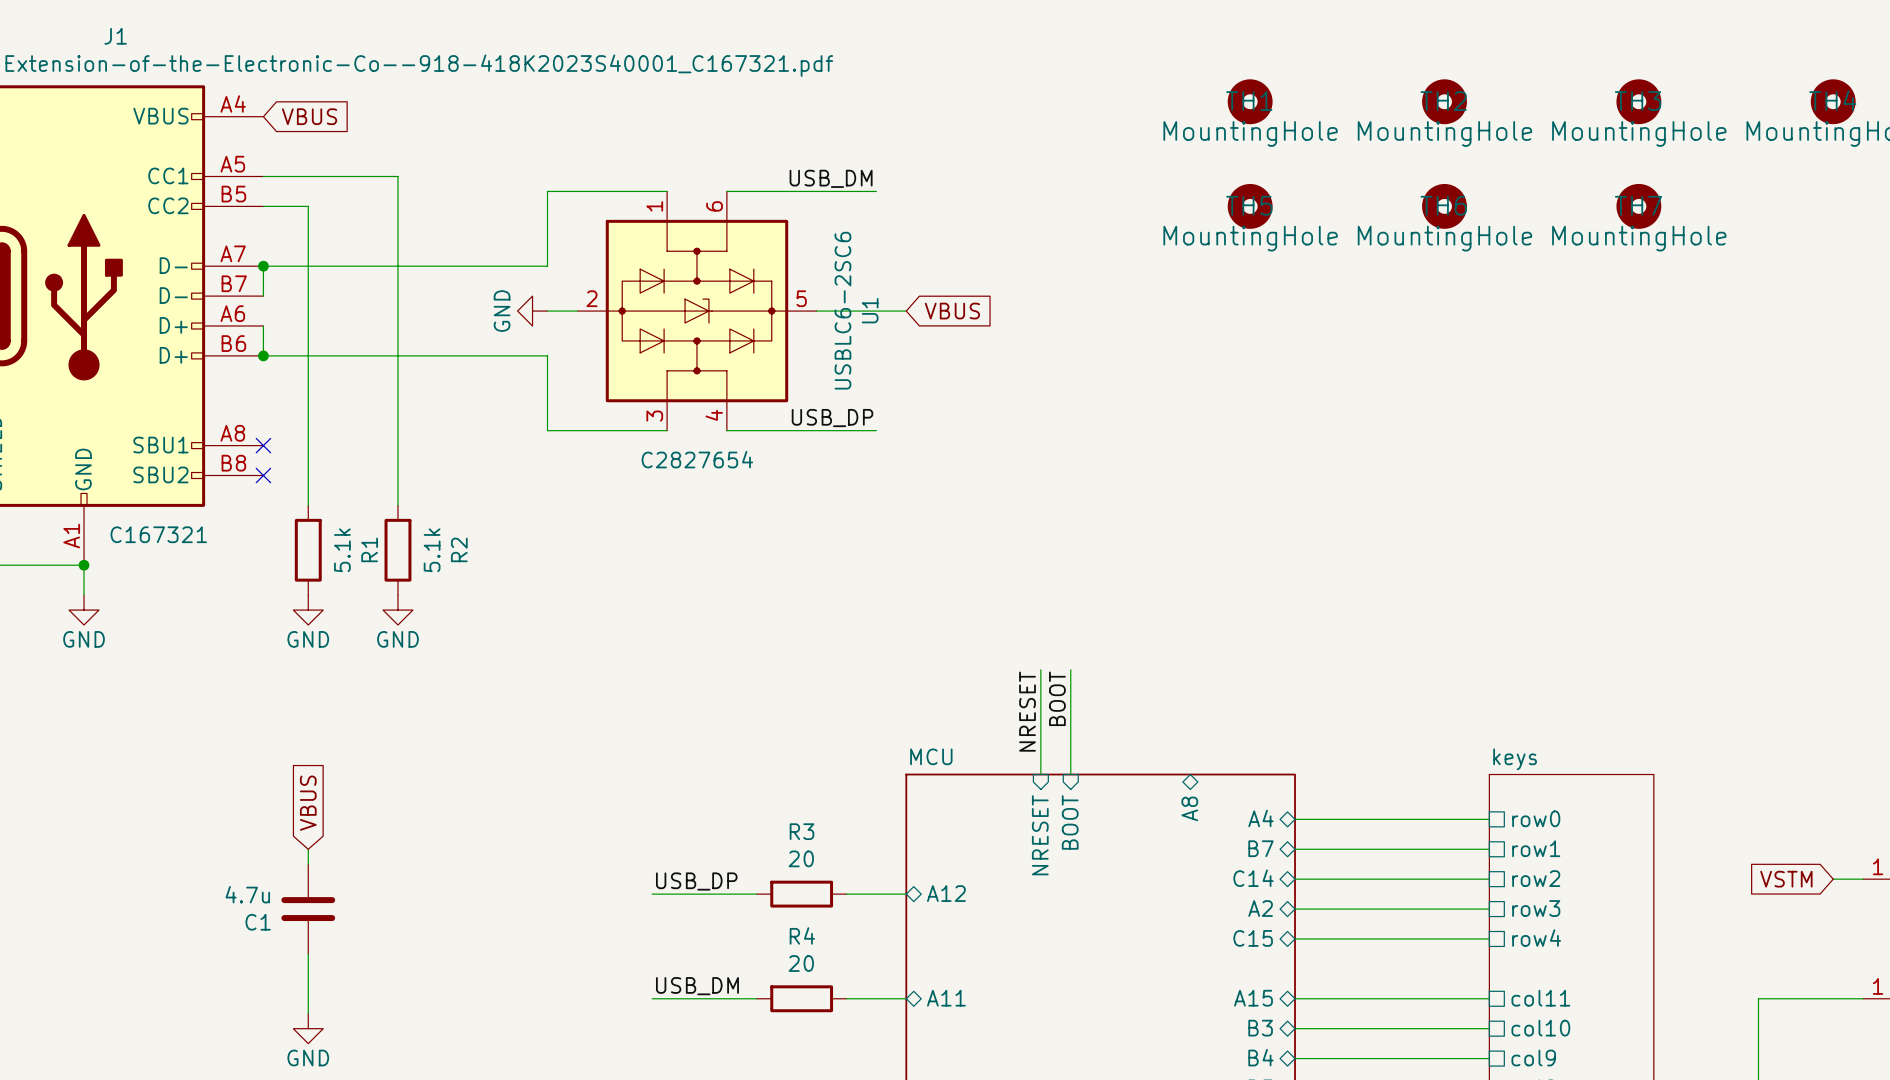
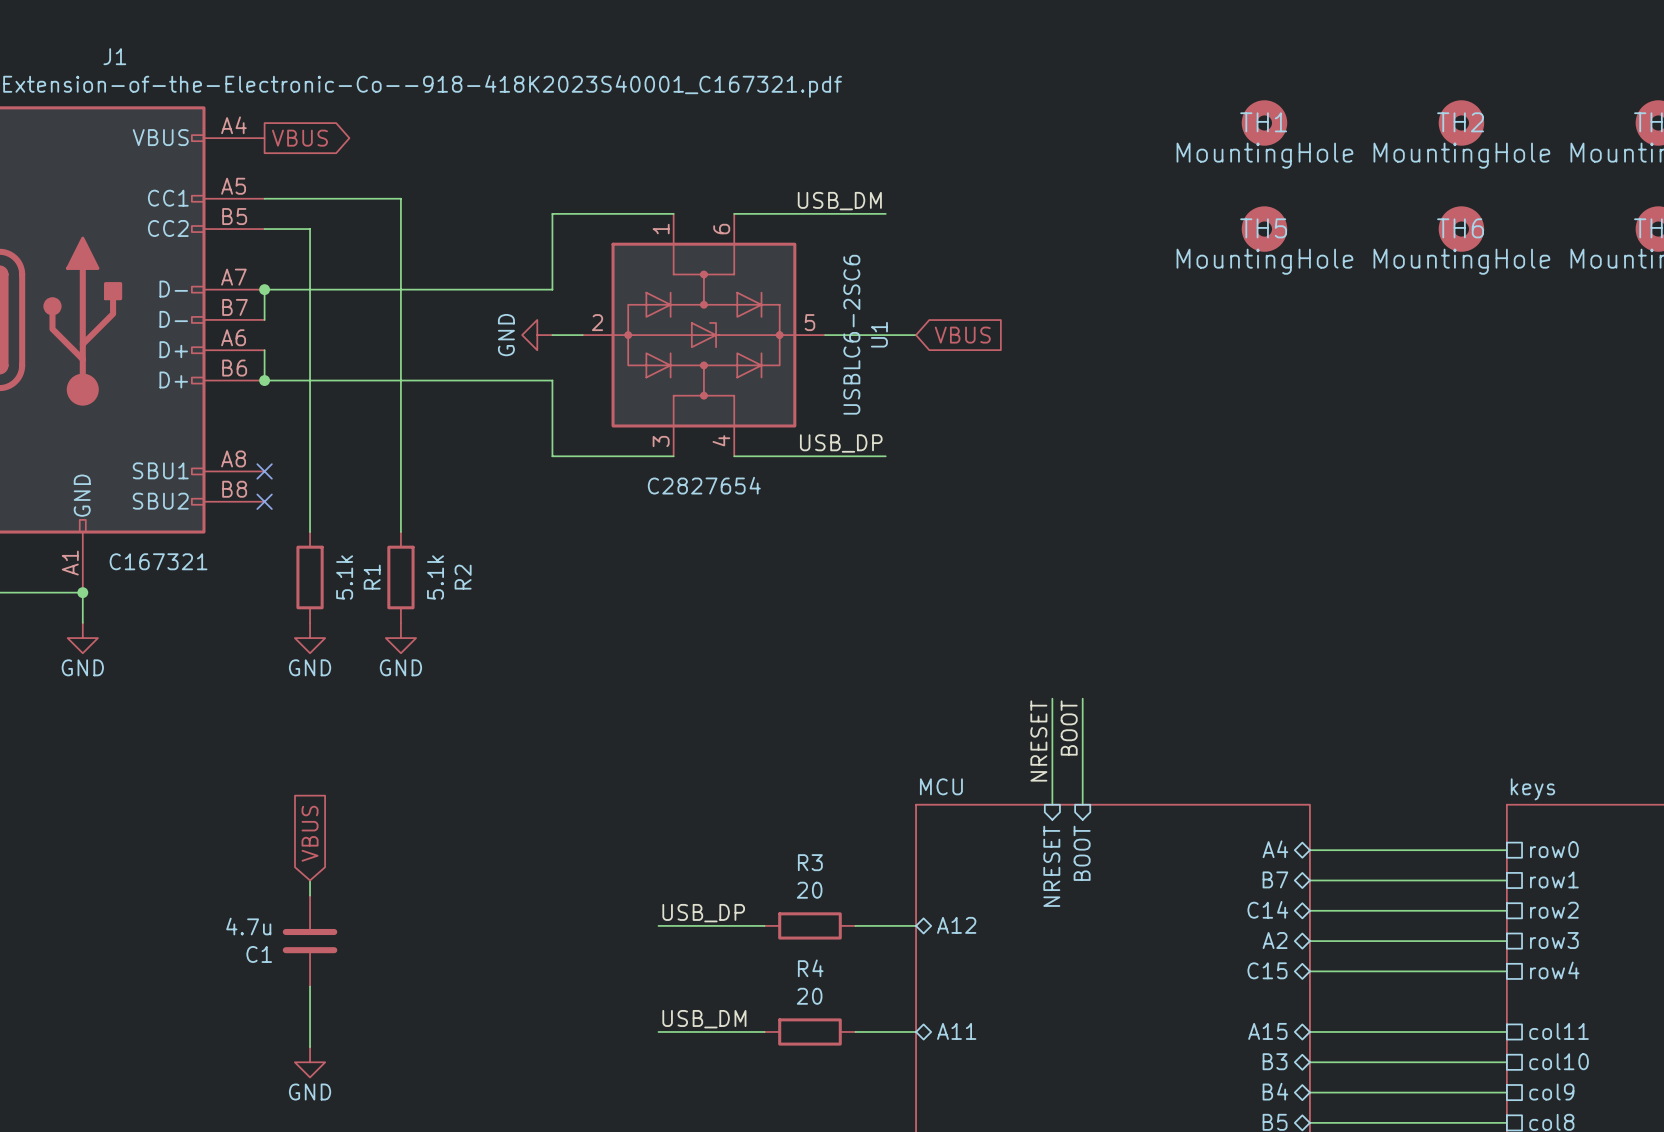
global label shape: input (309, 116) -> output (299, 138)
sheet pin: A8 (1189, 808) -> none

